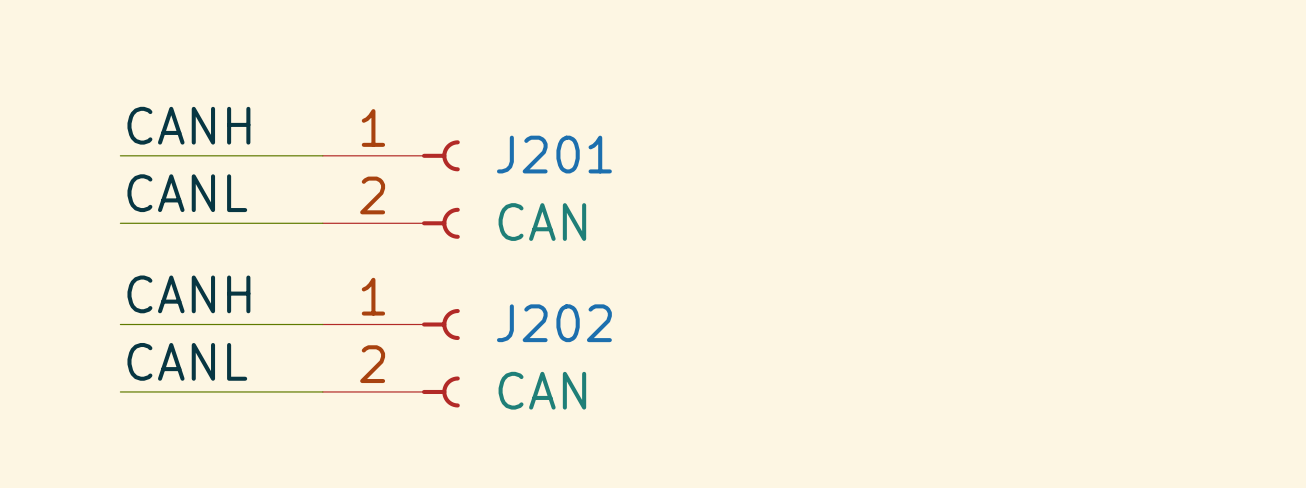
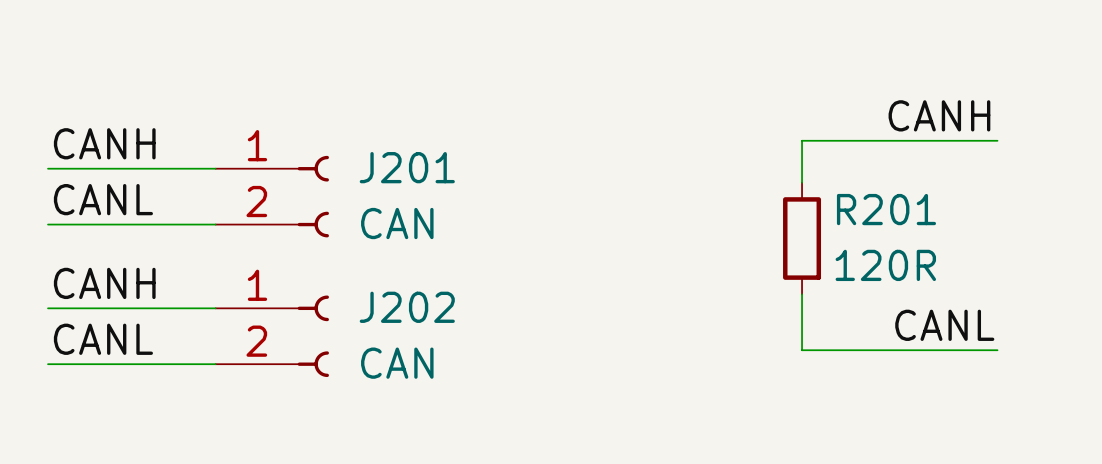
label: none -> CANH (939, 115)
wire: none -> (997, 140) (802, 140) (802, 182)
R201: none -> 120R (802, 238)
wire: none -> (802, 294) (802, 350) (997, 350)
label: none -> CANL (944, 325)

